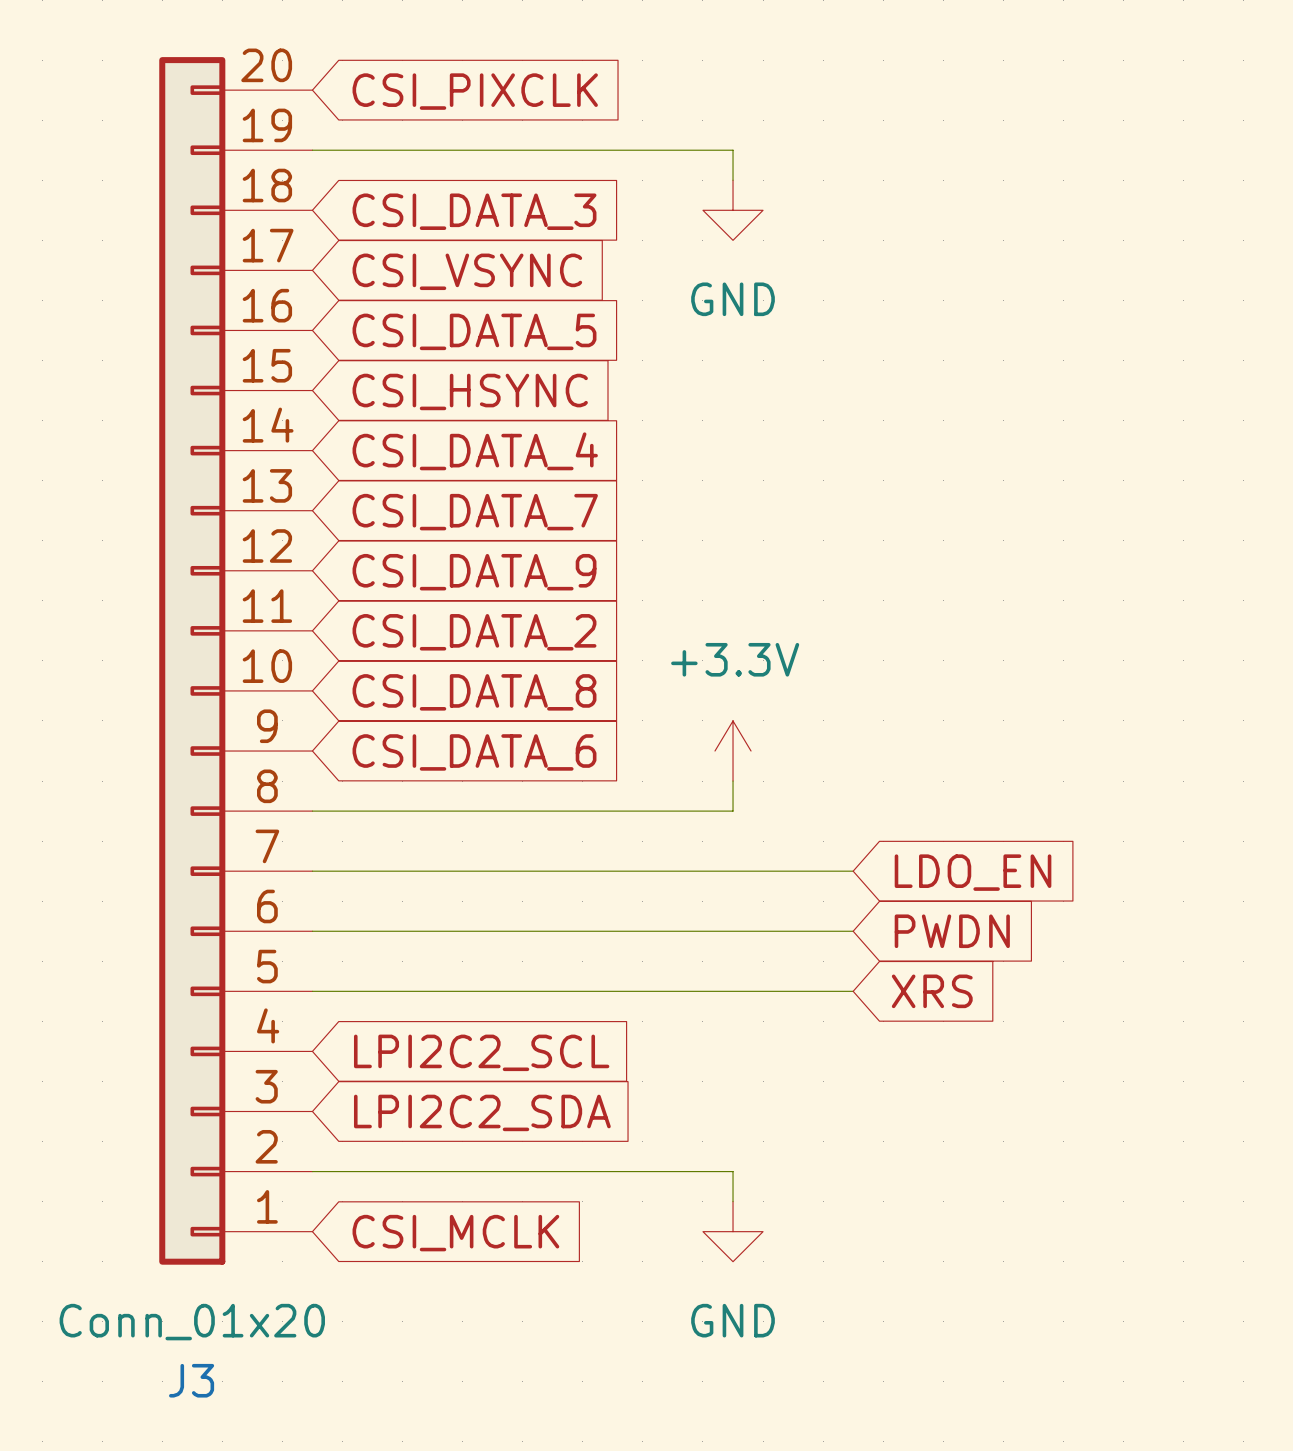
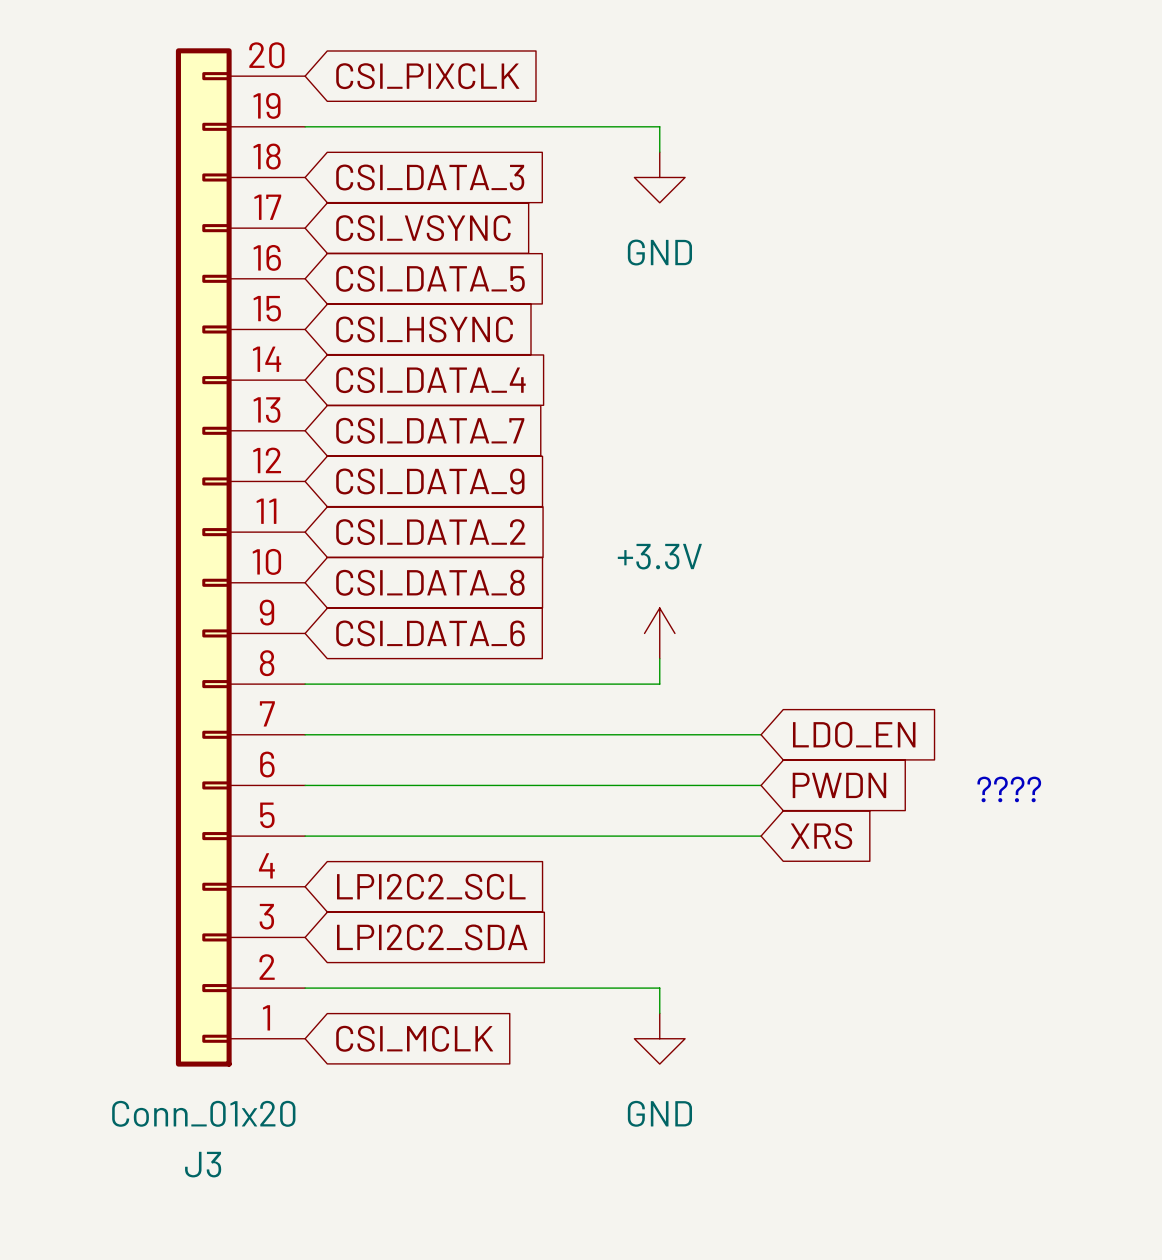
text: none -> ???? (1009, 789)

